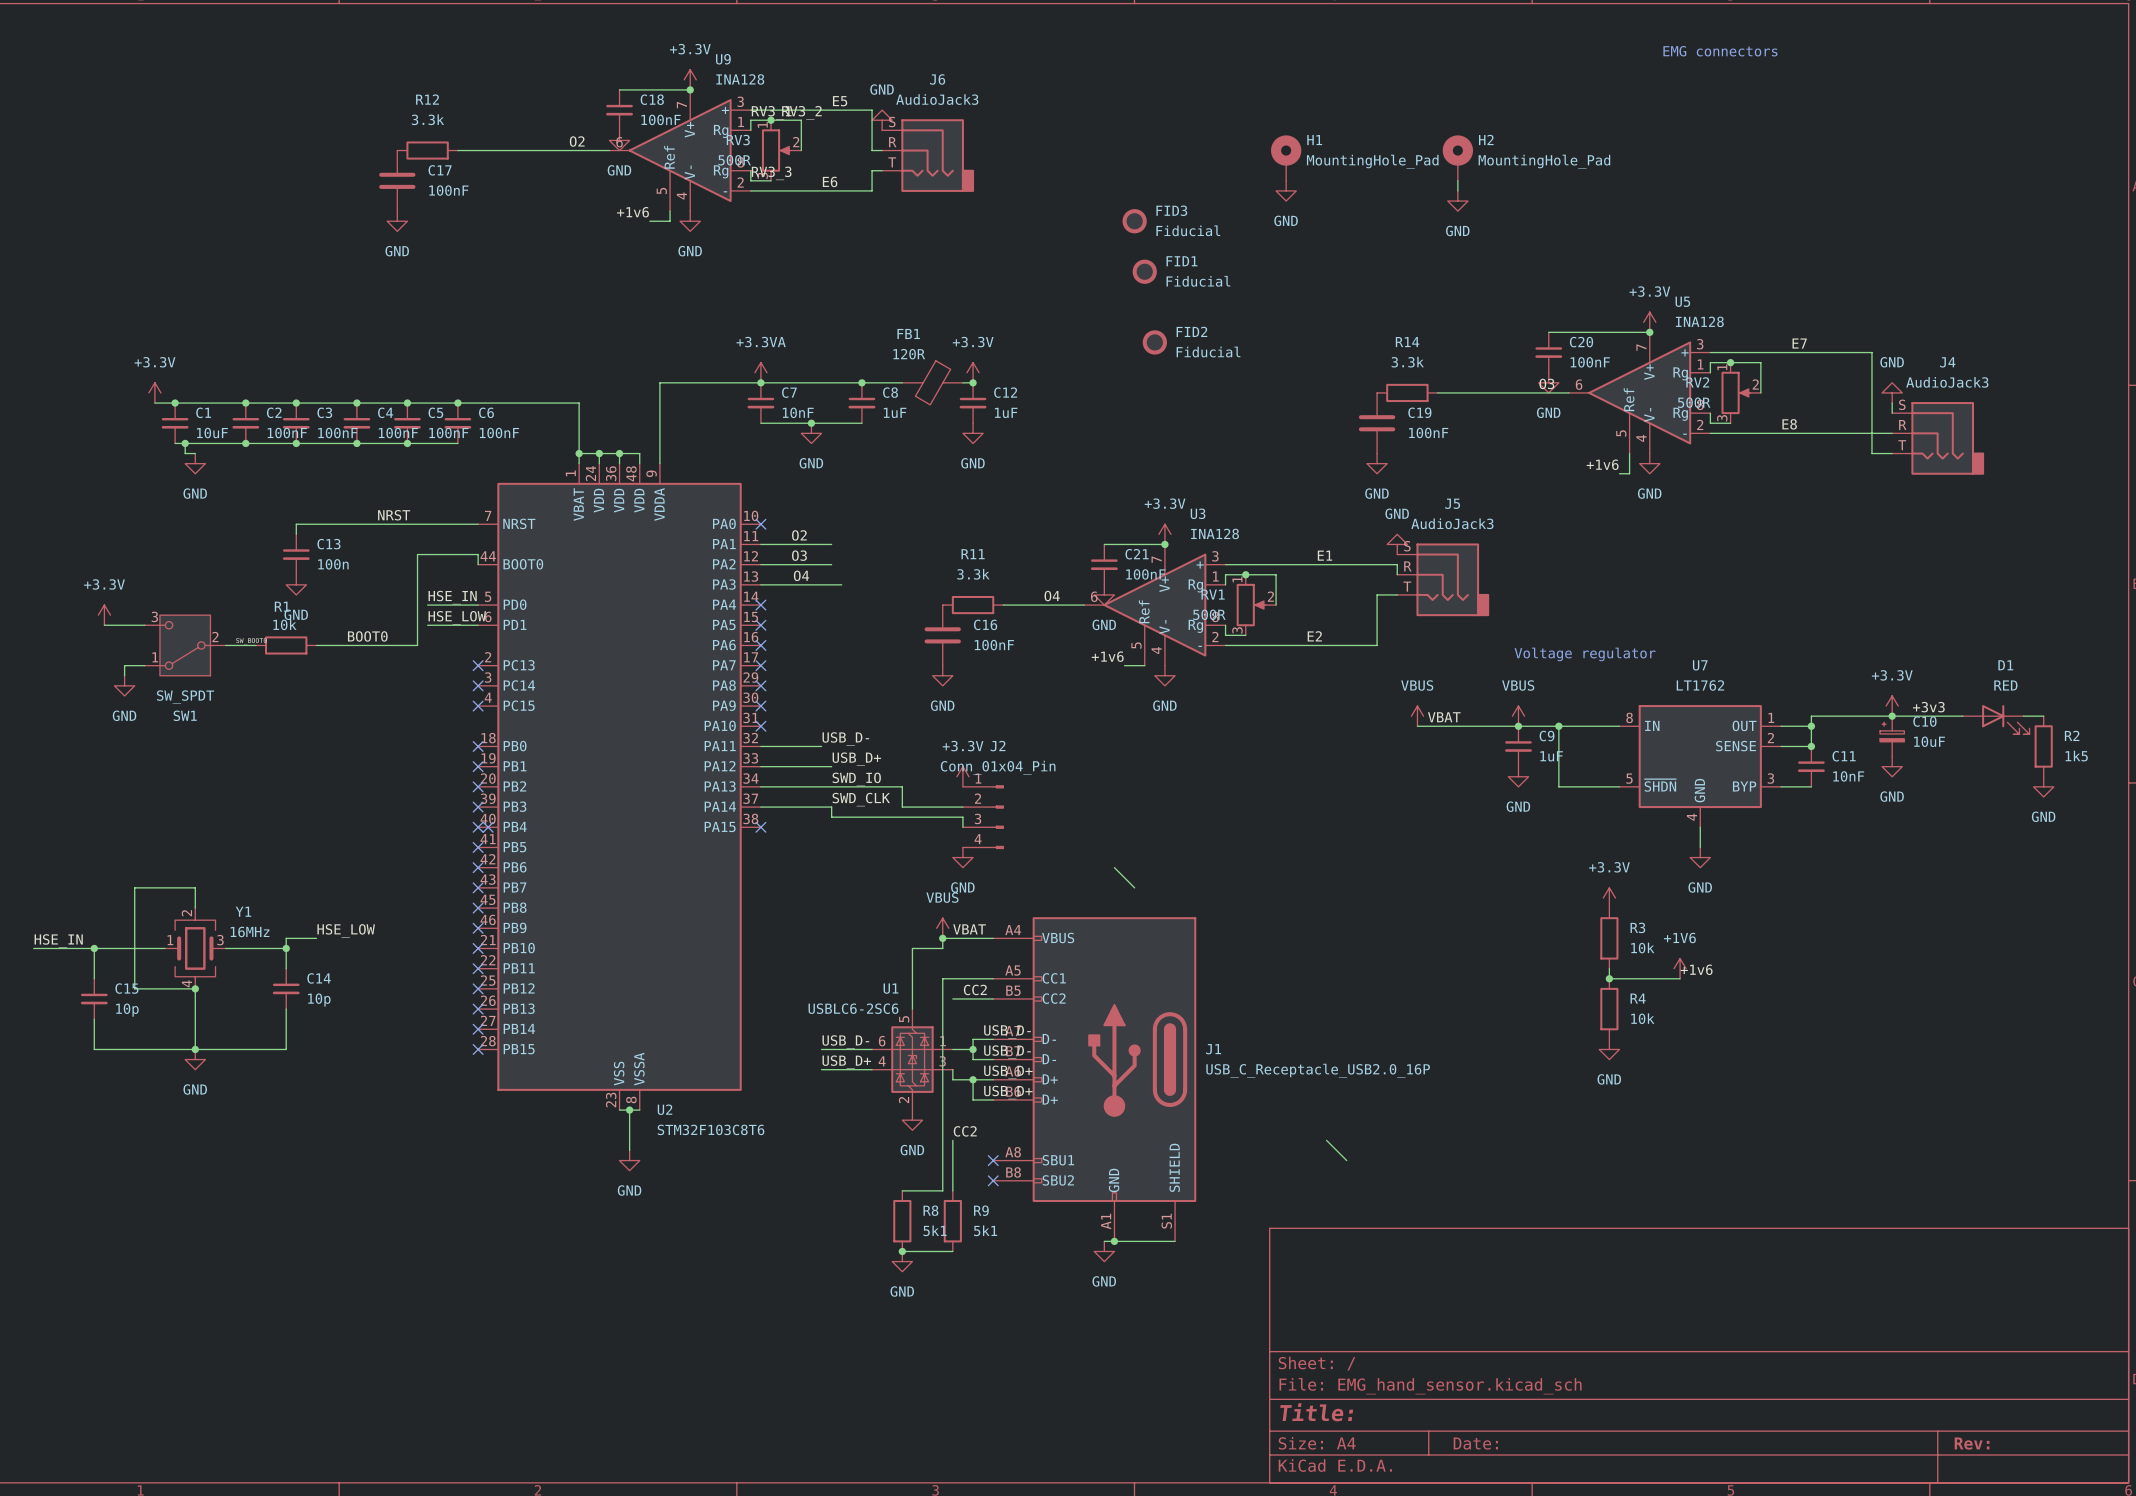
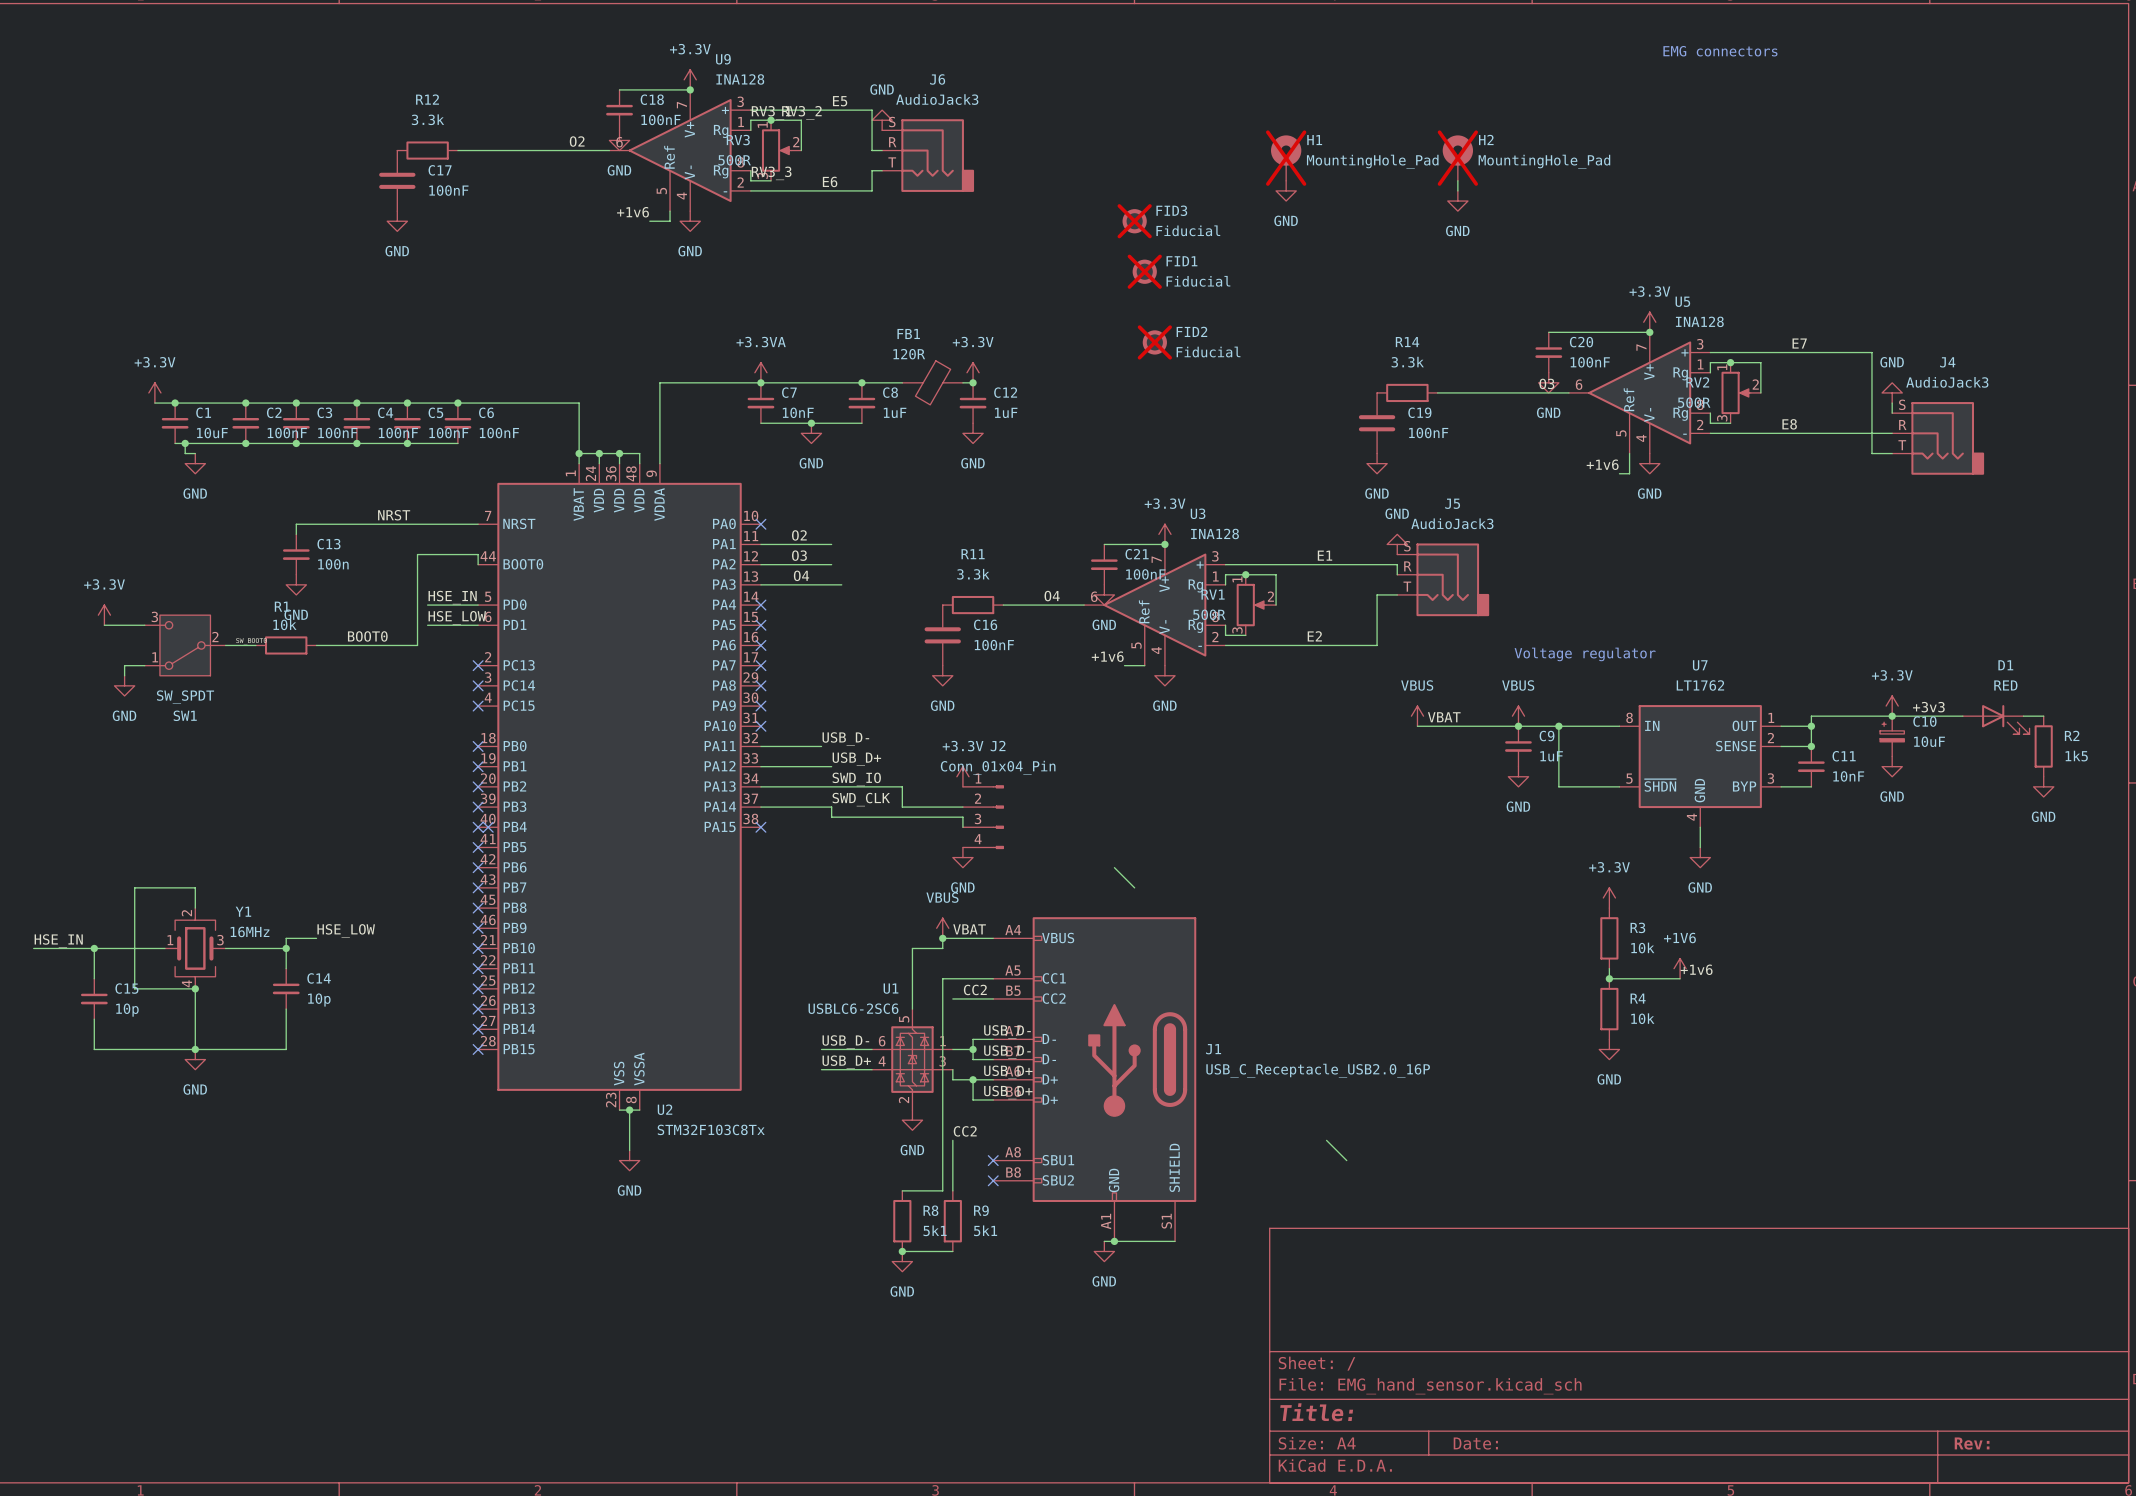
H1 do-not-place cross: none -> (1286, 158)
H2 do-not-place cross: none -> (1457, 158)
FID3 do-not-place cross: none -> (1134, 221)
FID1 do-not-place cross: none -> (1144, 271)
FID2 do-not-place cross: none -> (1154, 342)
U2 value: STM32F103C8T6 (711, 1129) -> STM32F103C8Tx (711, 1129)

